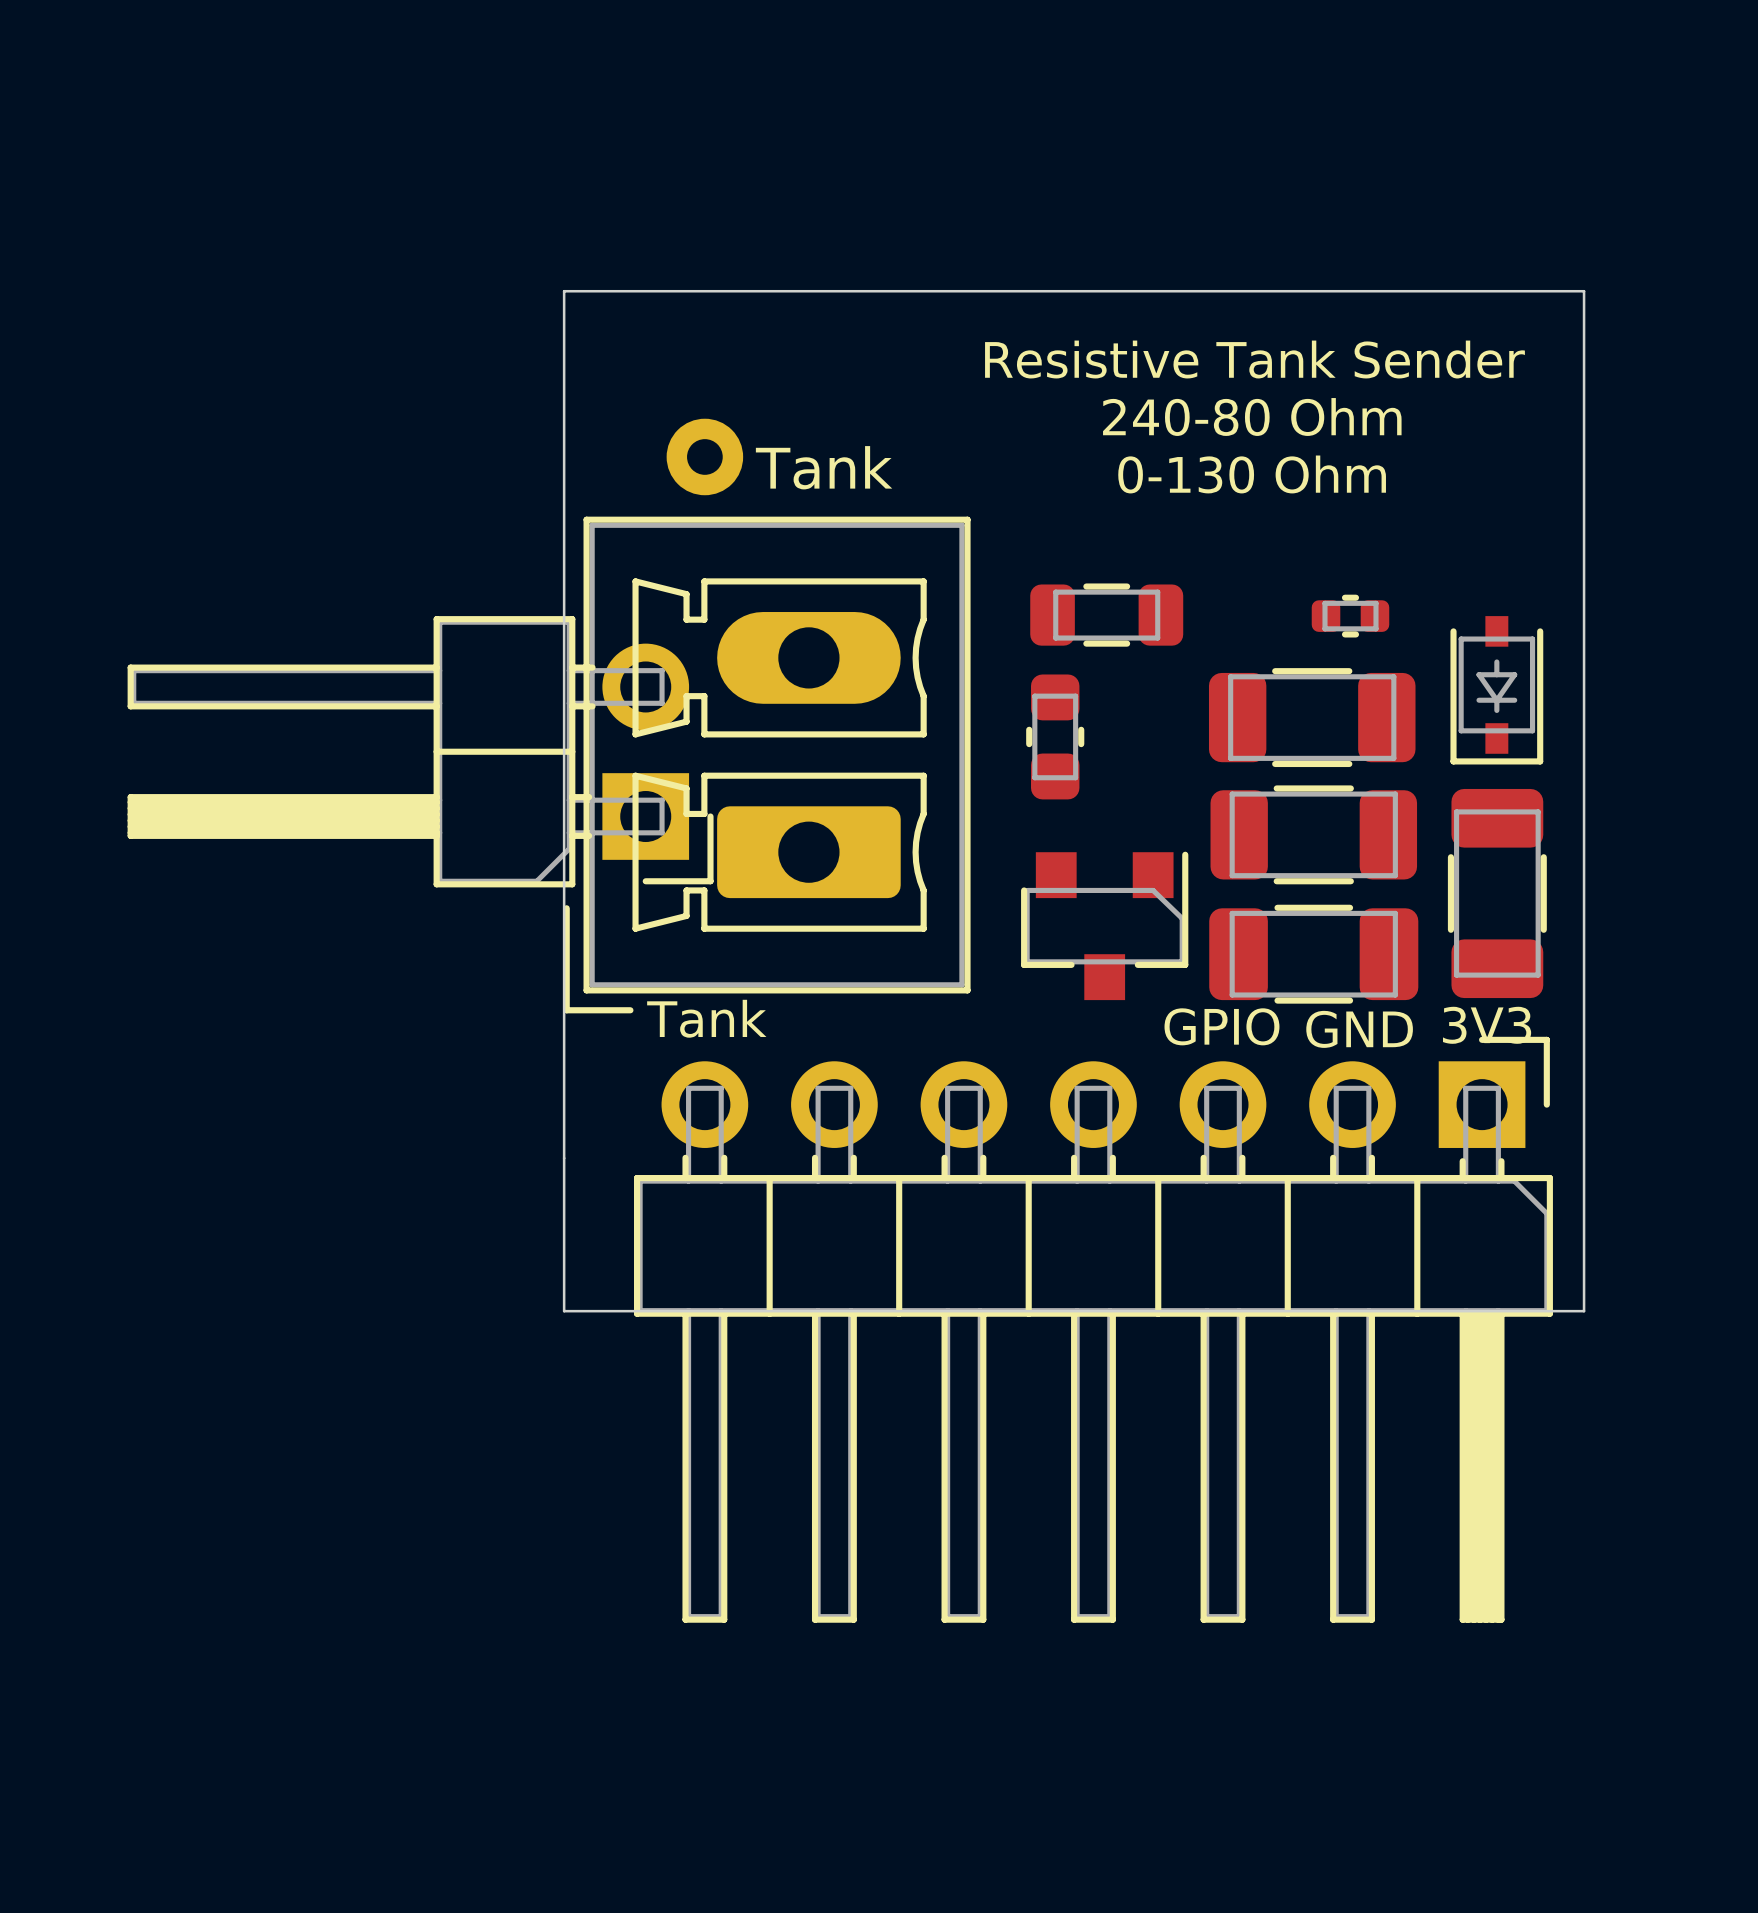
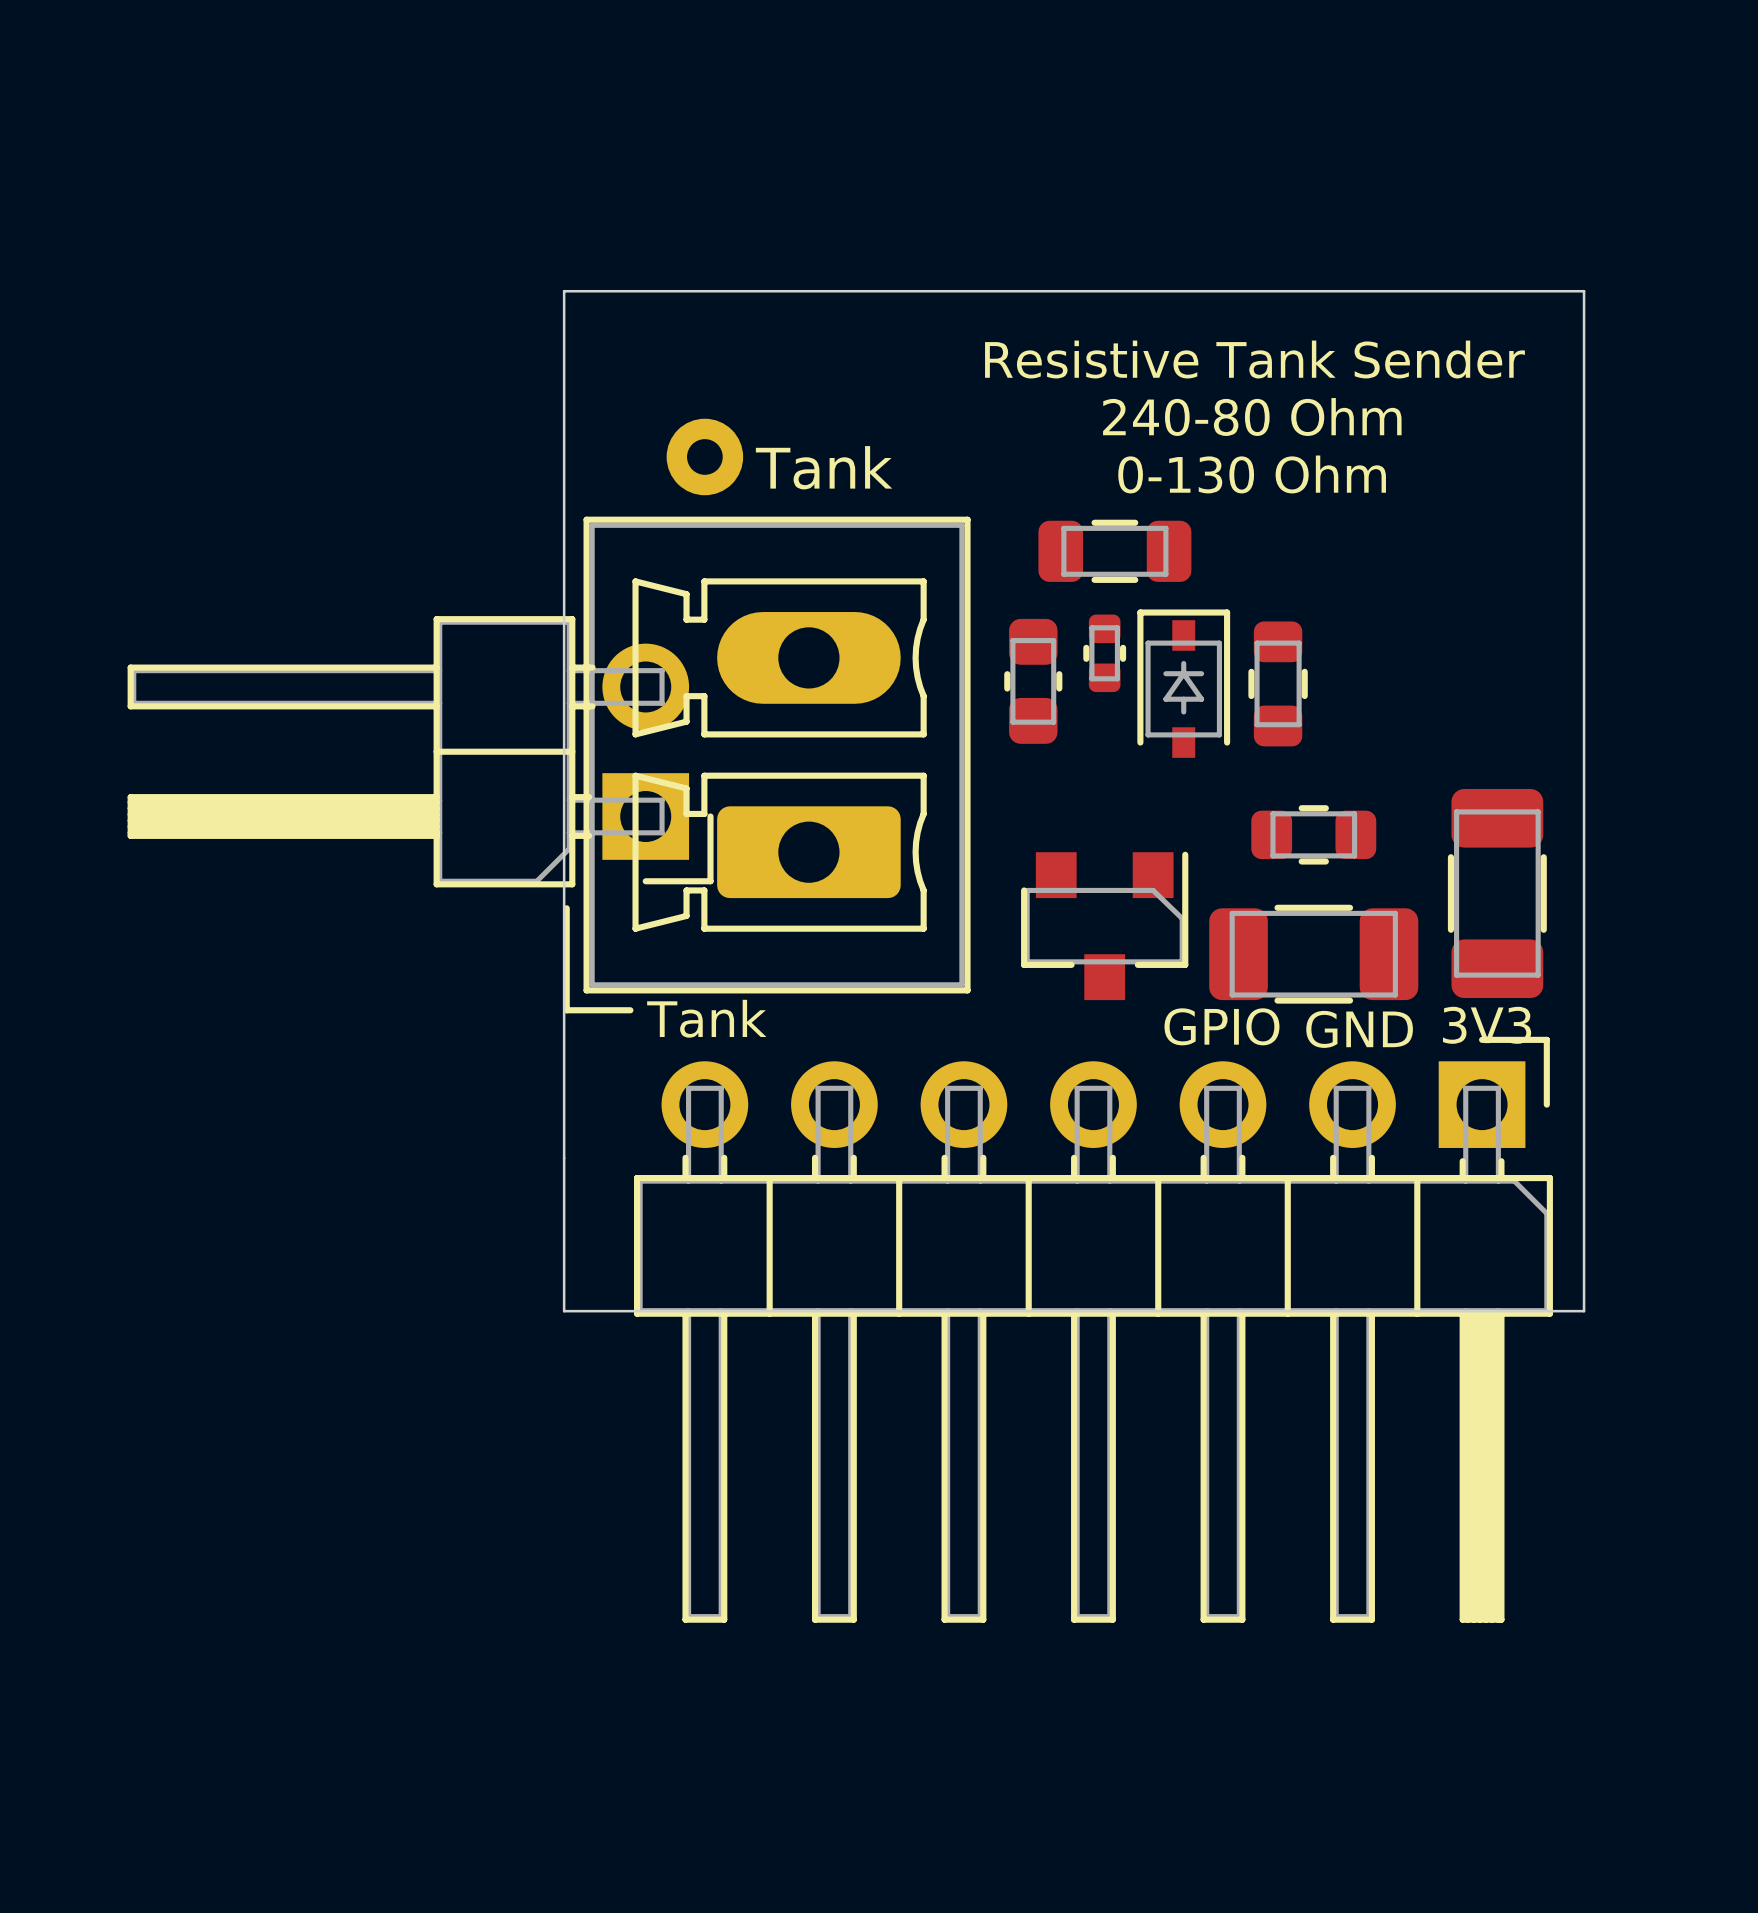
part position: (1106, 615) -> (1114, 551)
part rotation: 0° (1350, 616) -> 90° clockwise (1104, 653)
part position: (1350, 616) -> (1104, 653)
part footprint: [1208, 668, 1416, 768] -> [1248, 621, 1308, 747]
part rotation: 0° (1496, 690) -> 180° (1183, 683)
part position: (1496, 690) -> (1183, 683)
part position: (1055, 736) -> (1033, 681)
part footprint: [1210, 785, 1418, 885] -> [1251, 805, 1377, 865]

